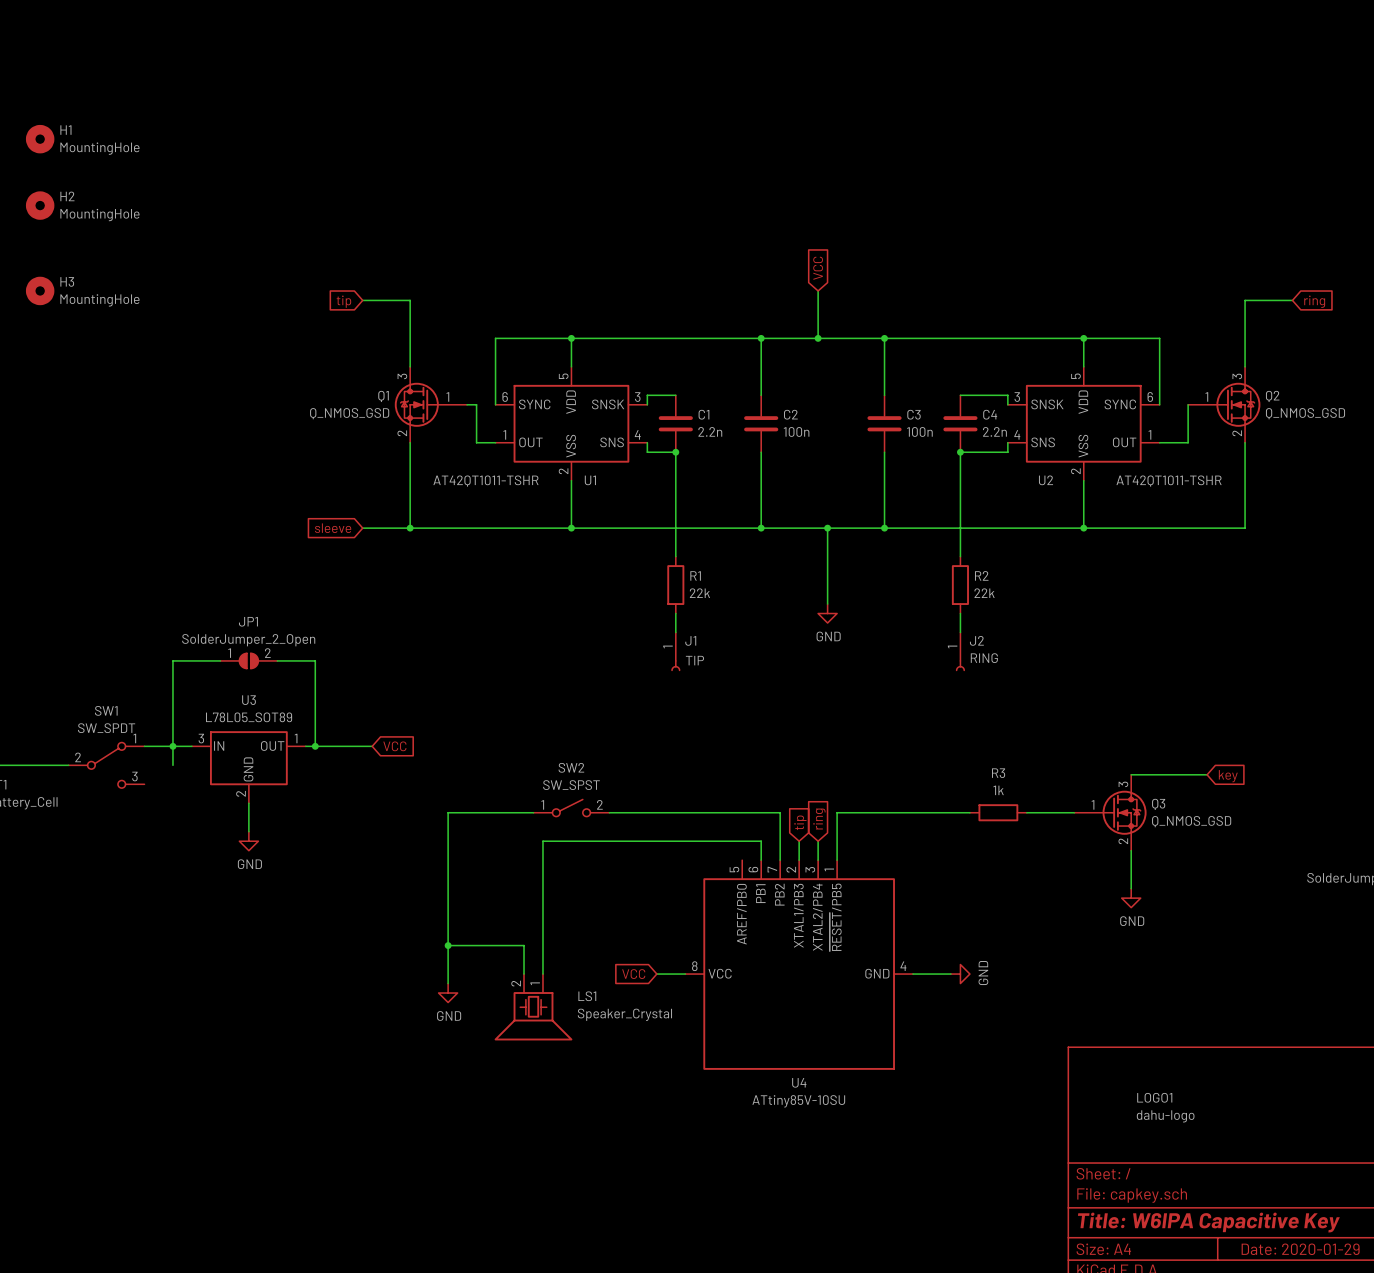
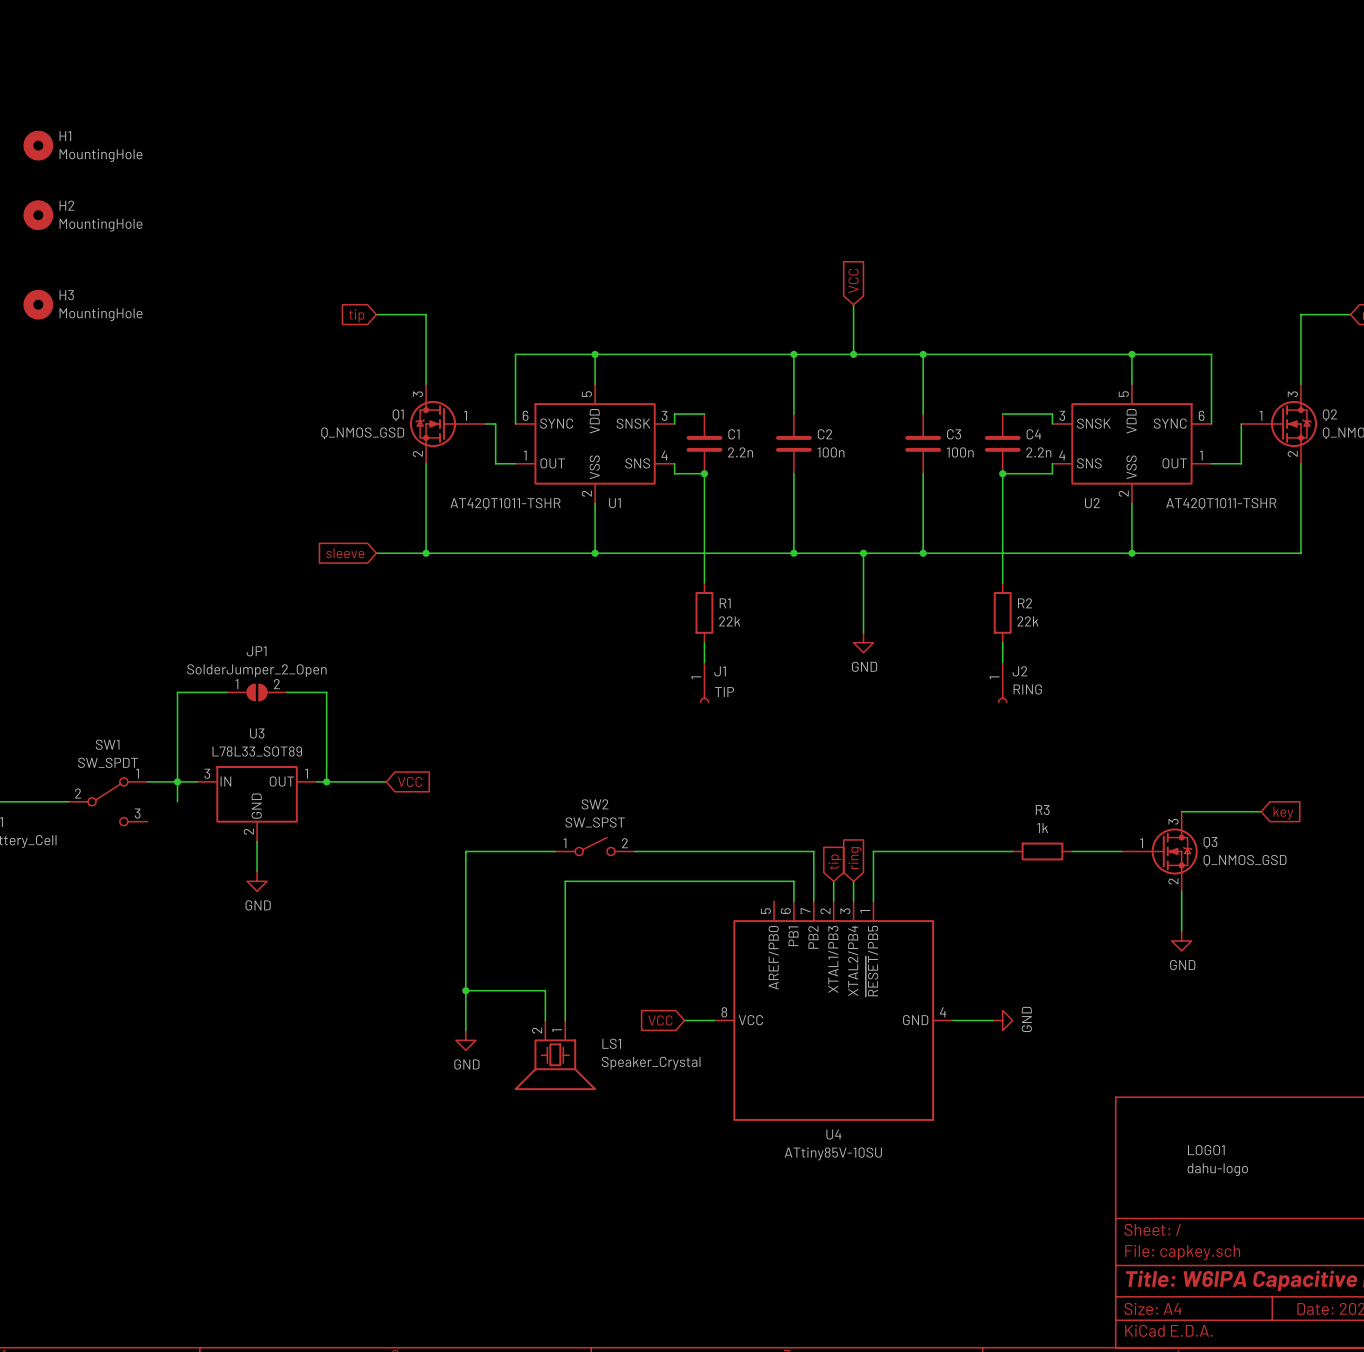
U3 value: L78L05_SOT89 (249, 717) -> L78L33_SOT89 (257, 751)

